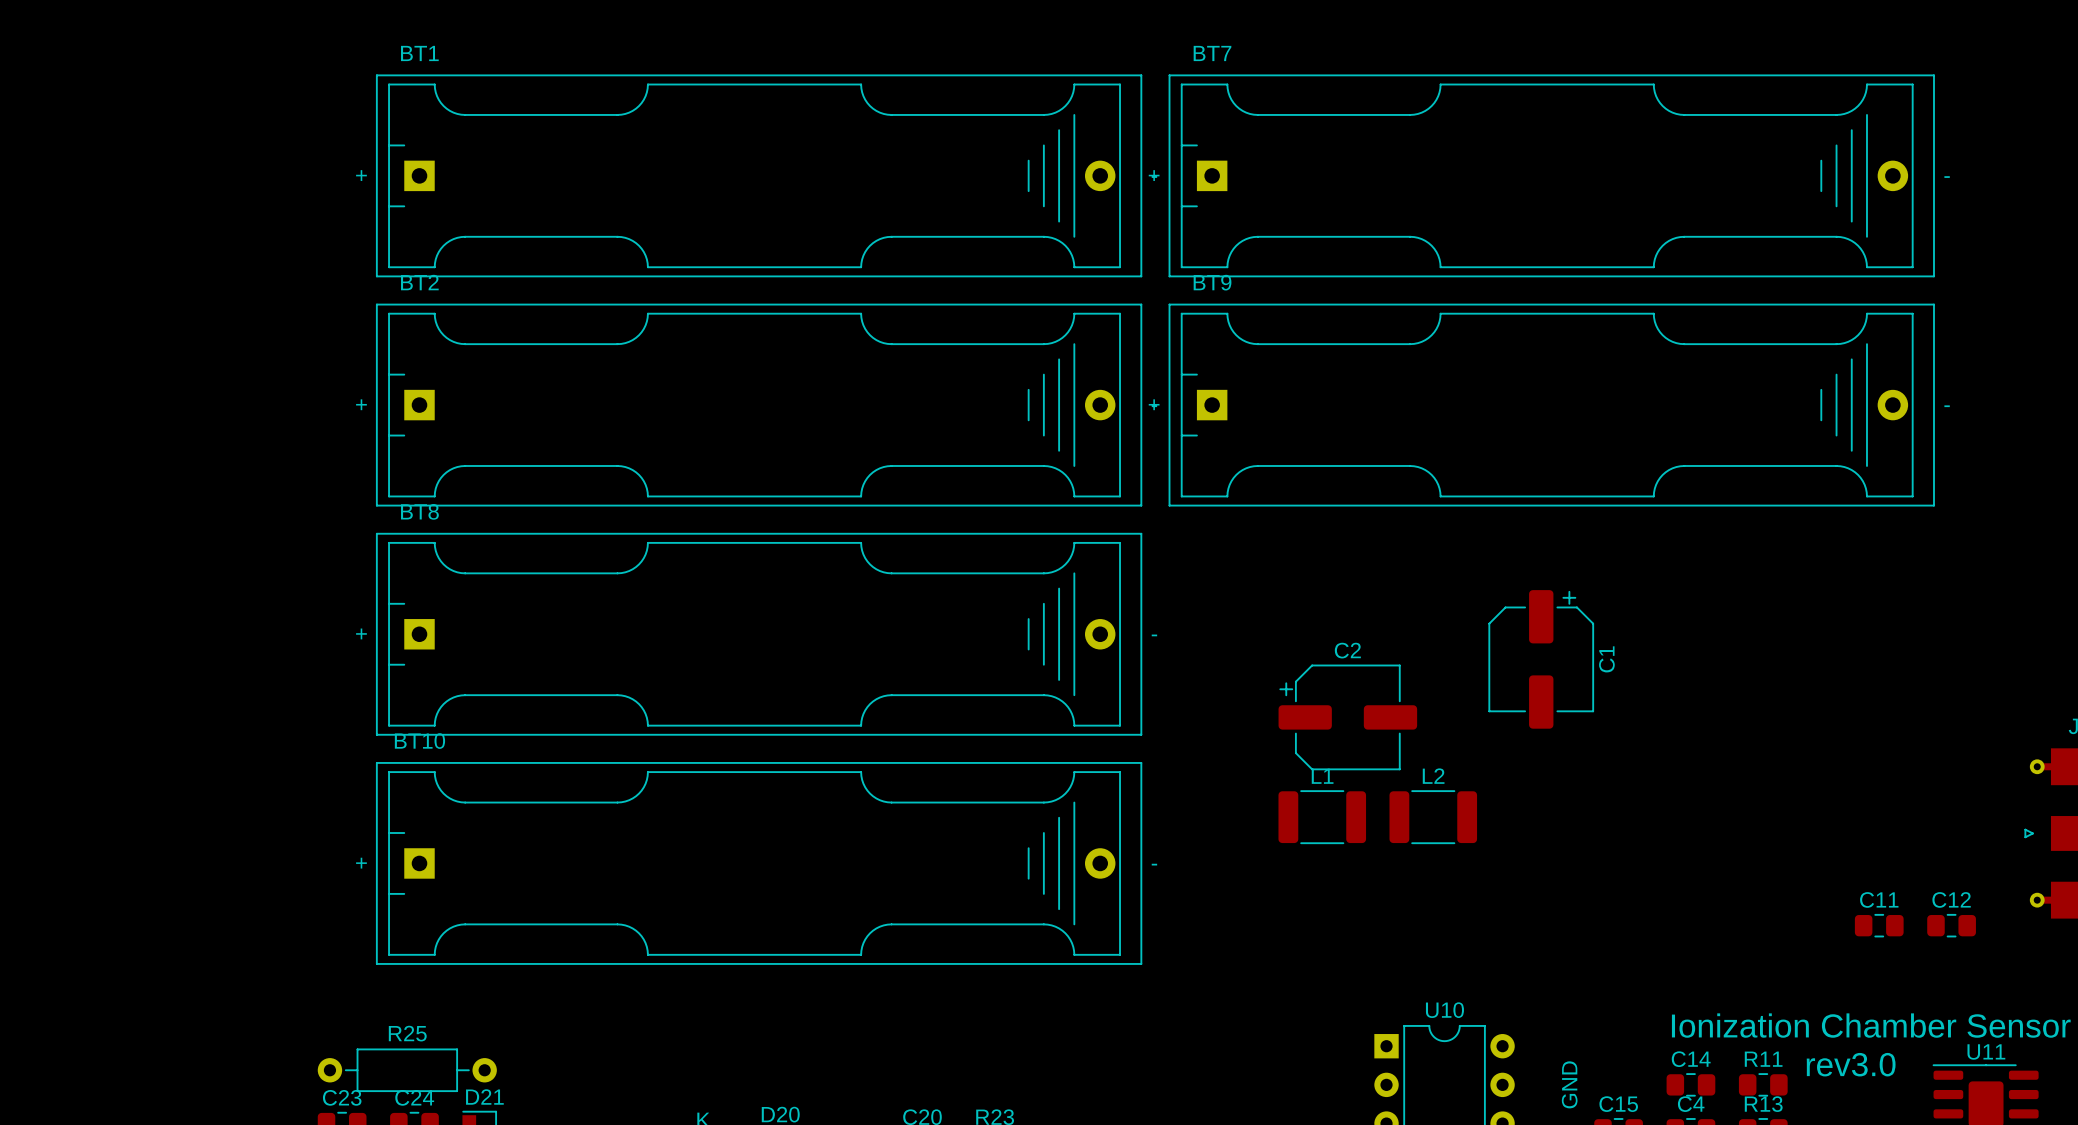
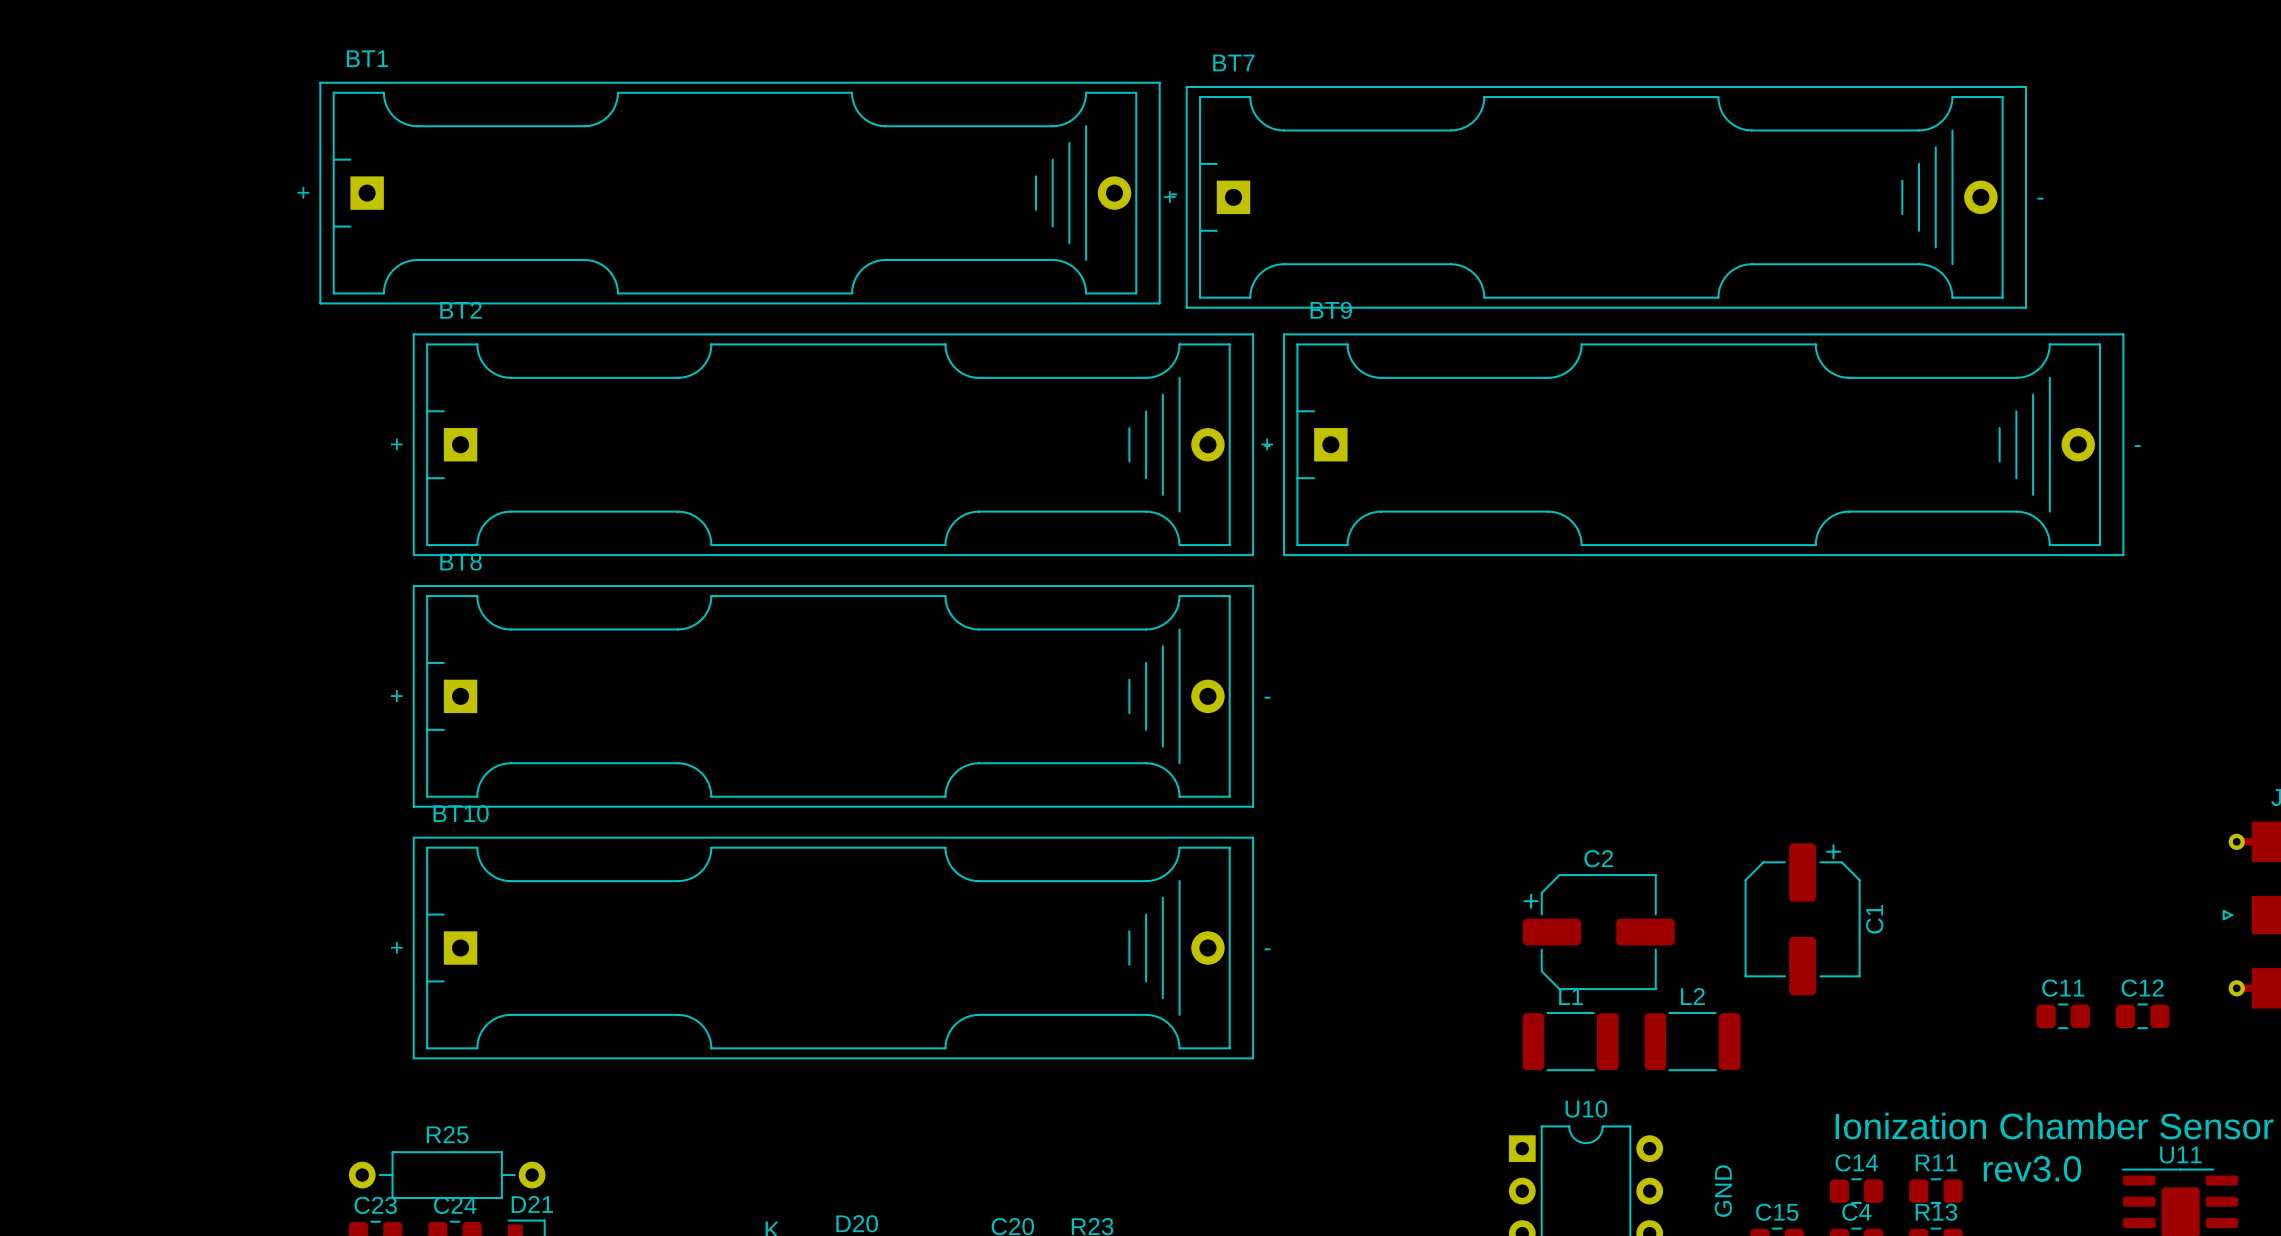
BT1 position: (759, 175) -> (740, 193)
BT7 position: (1551, 175) -> (1606, 197)
C1 footprint: [1488, 590, 1595, 729] -> [1744, 843, 1861, 996]
C2 footprint: [1278, 664, 1418, 771] -> [1522, 874, 1675, 991]
L1 position: (1322, 817) -> (1570, 1041)
L2 position: (1433, 817) -> (1692, 1041)

